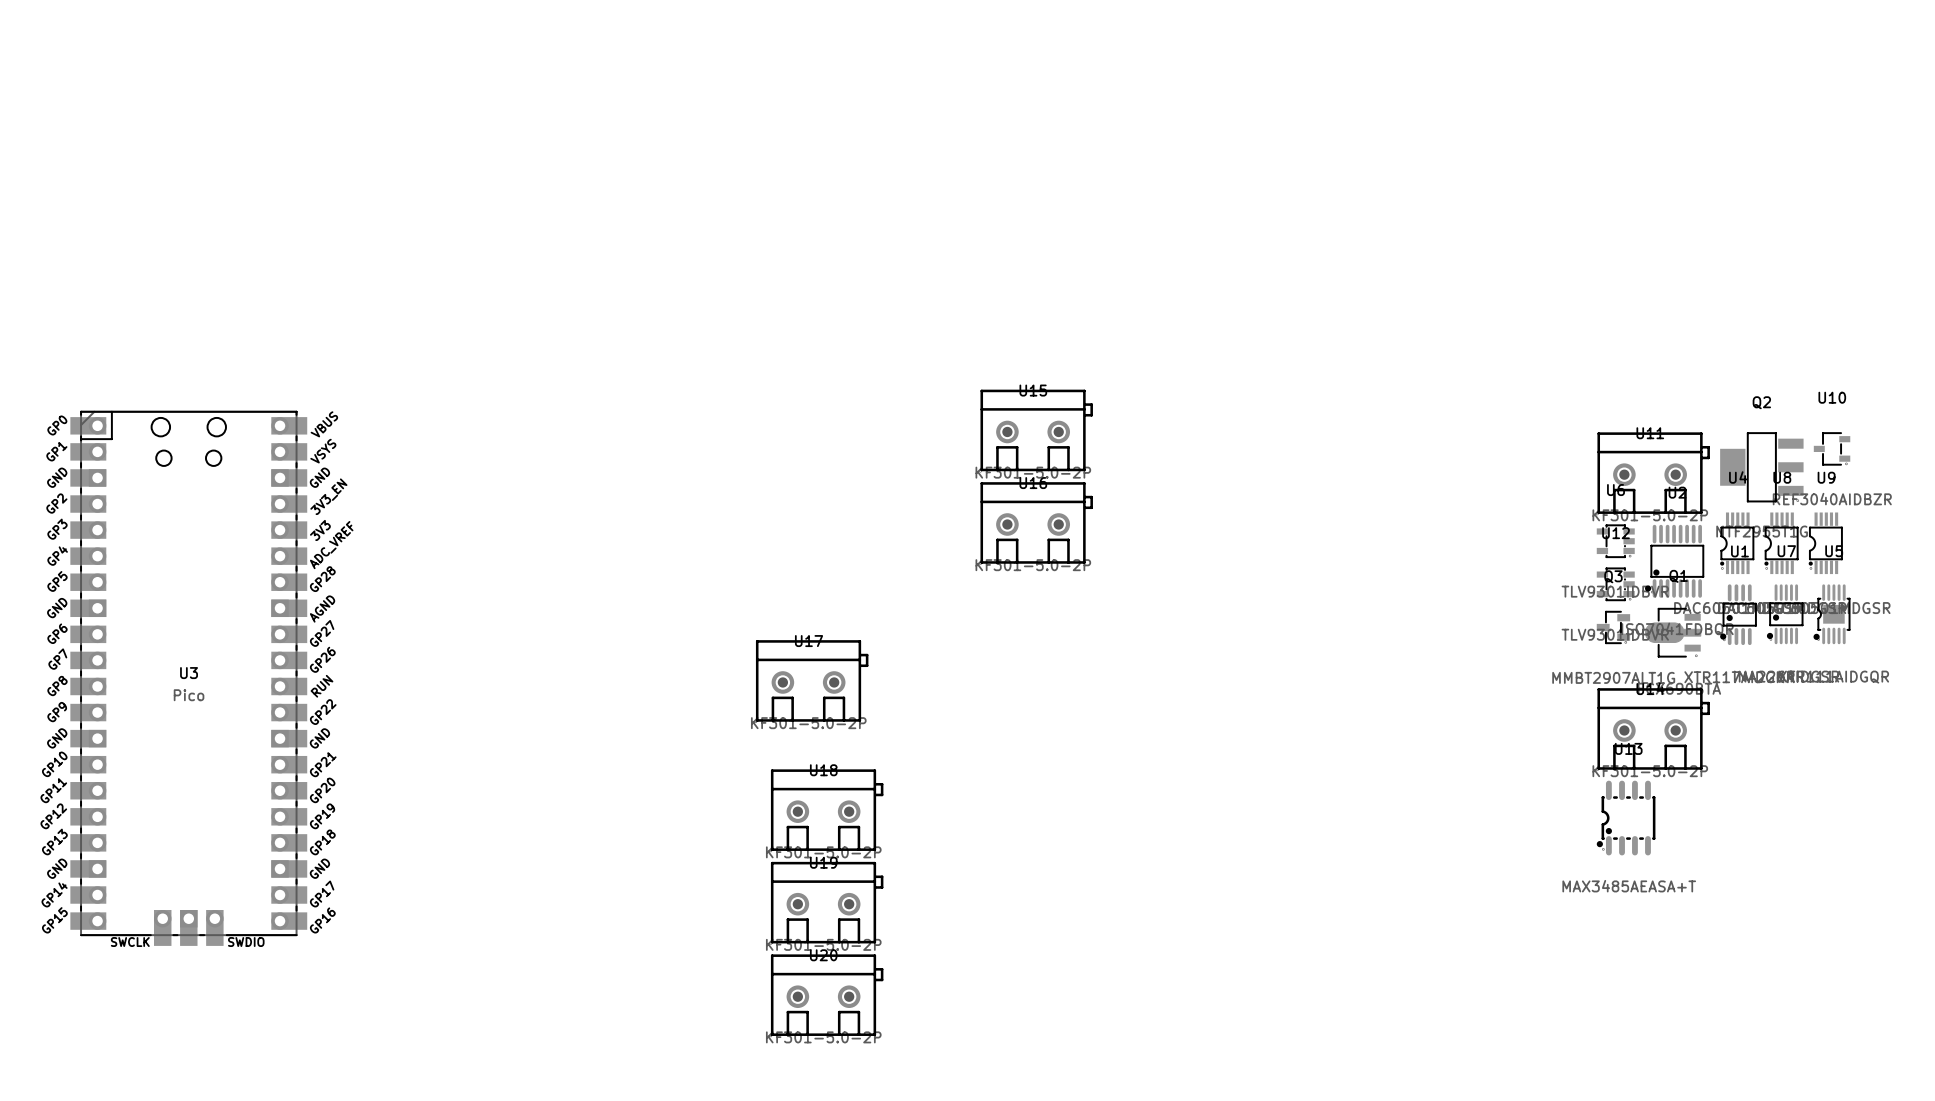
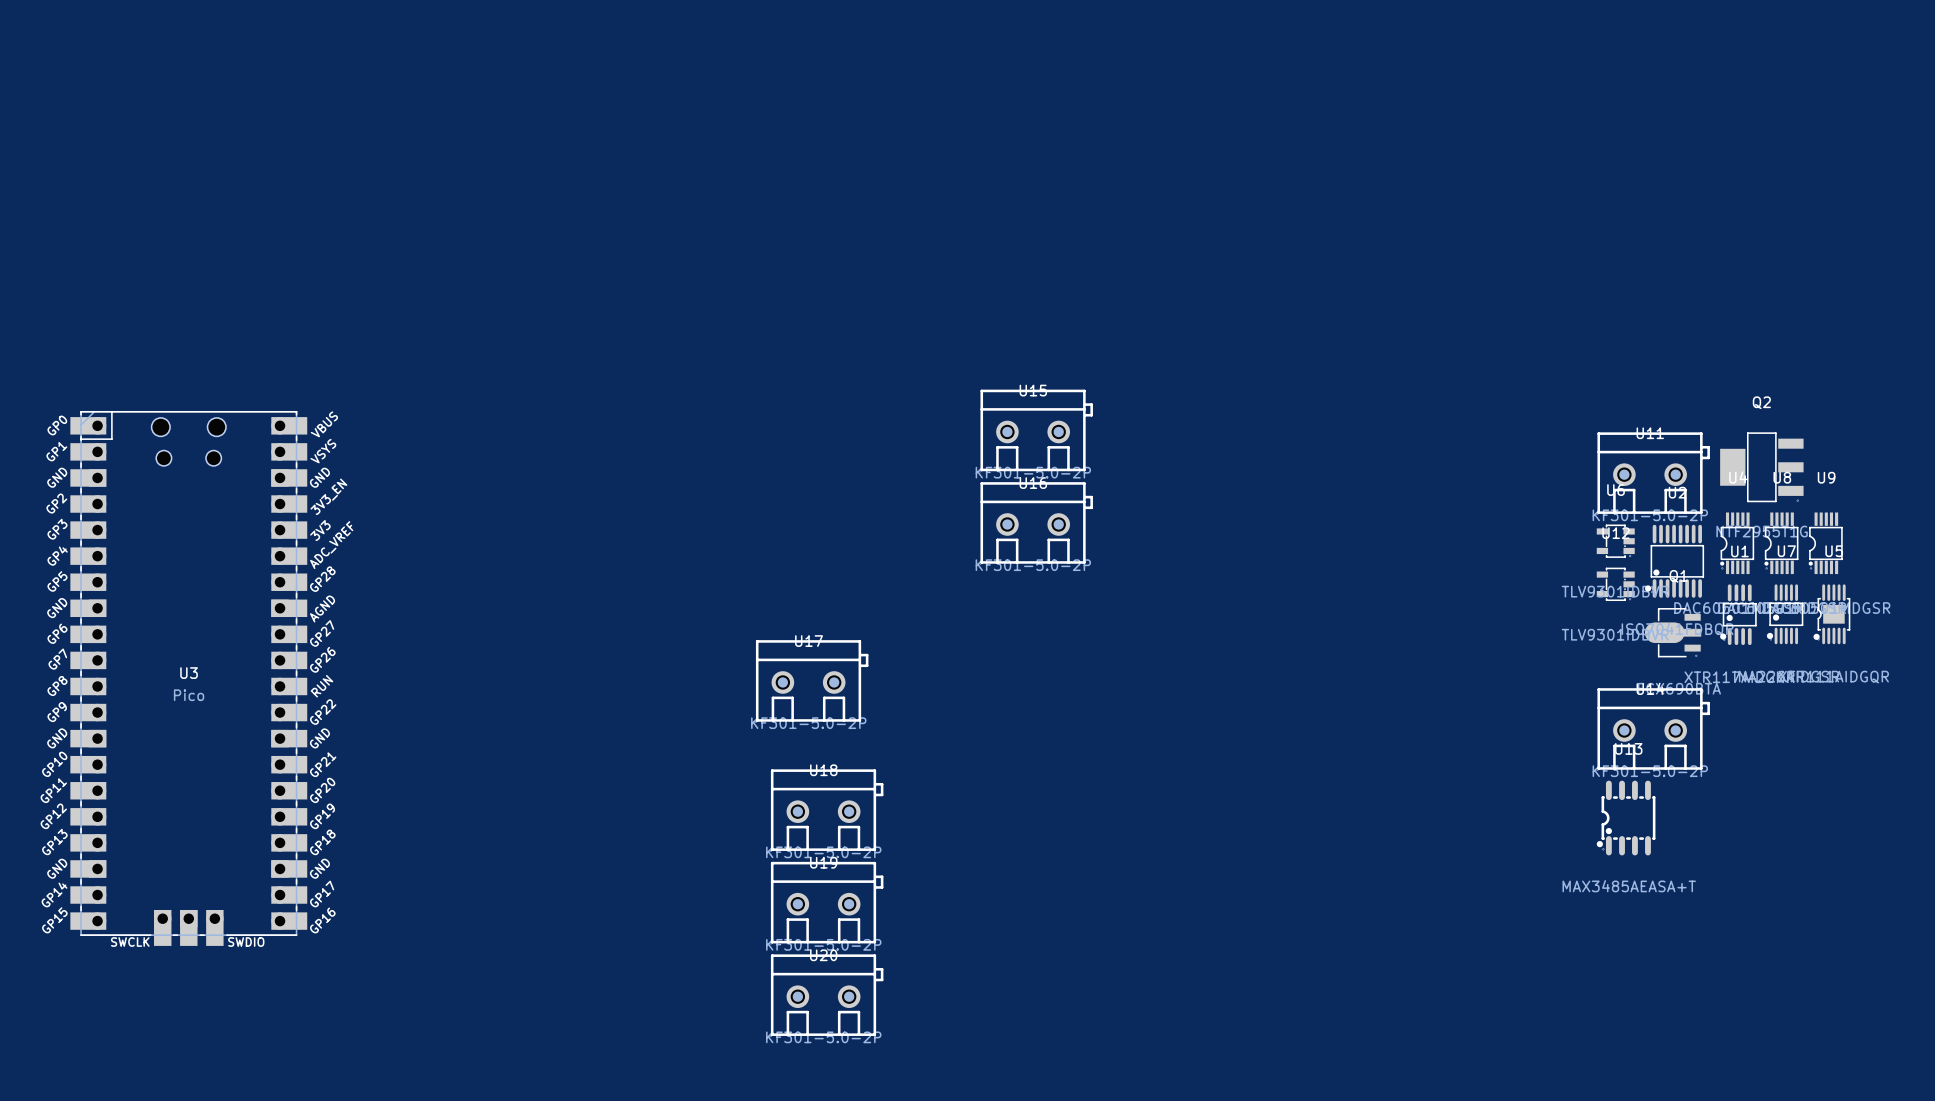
U10: REF3040AIDBZR (1832, 448) -> none
Q3: MMBT2907ALT1G (1613, 627) -> none

